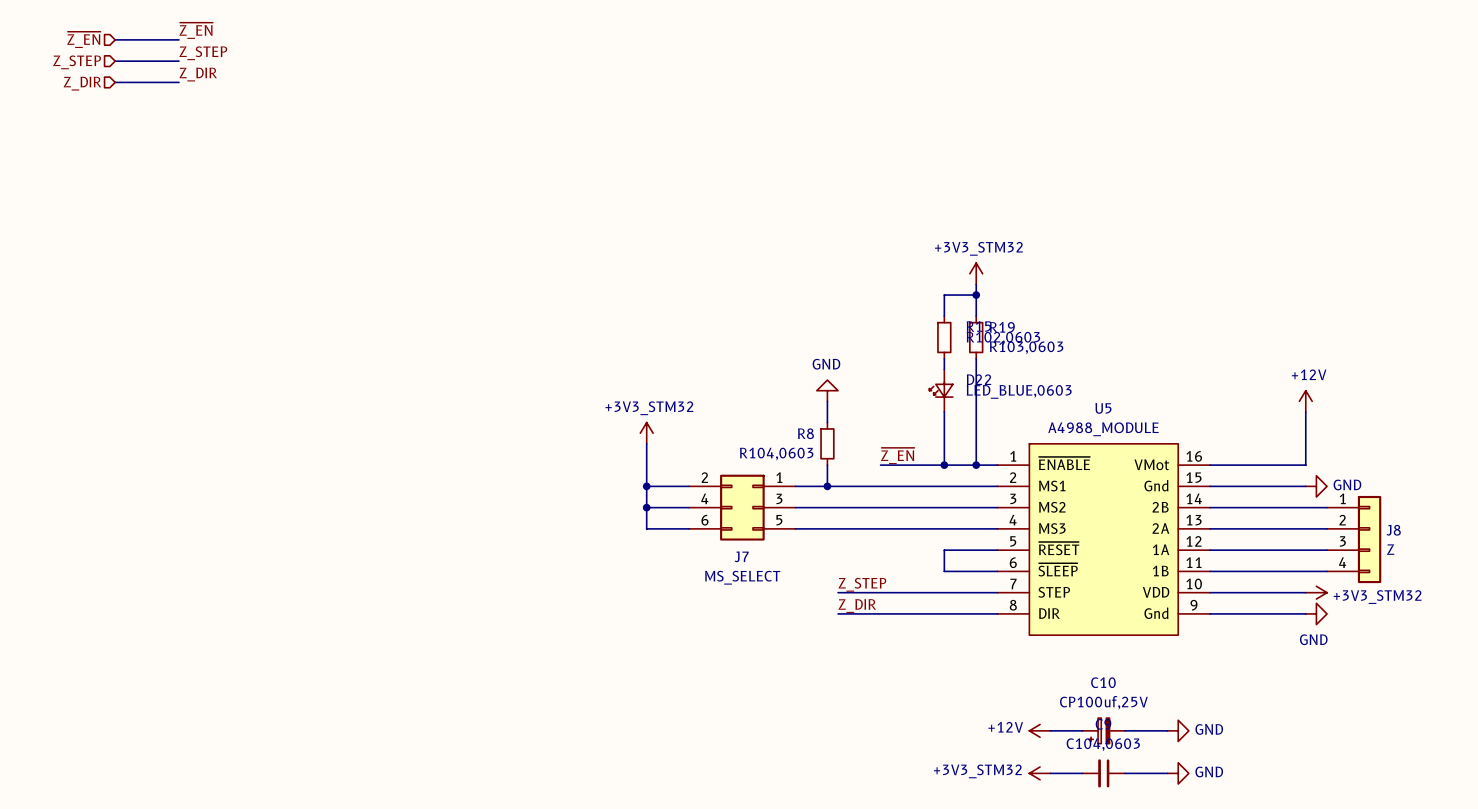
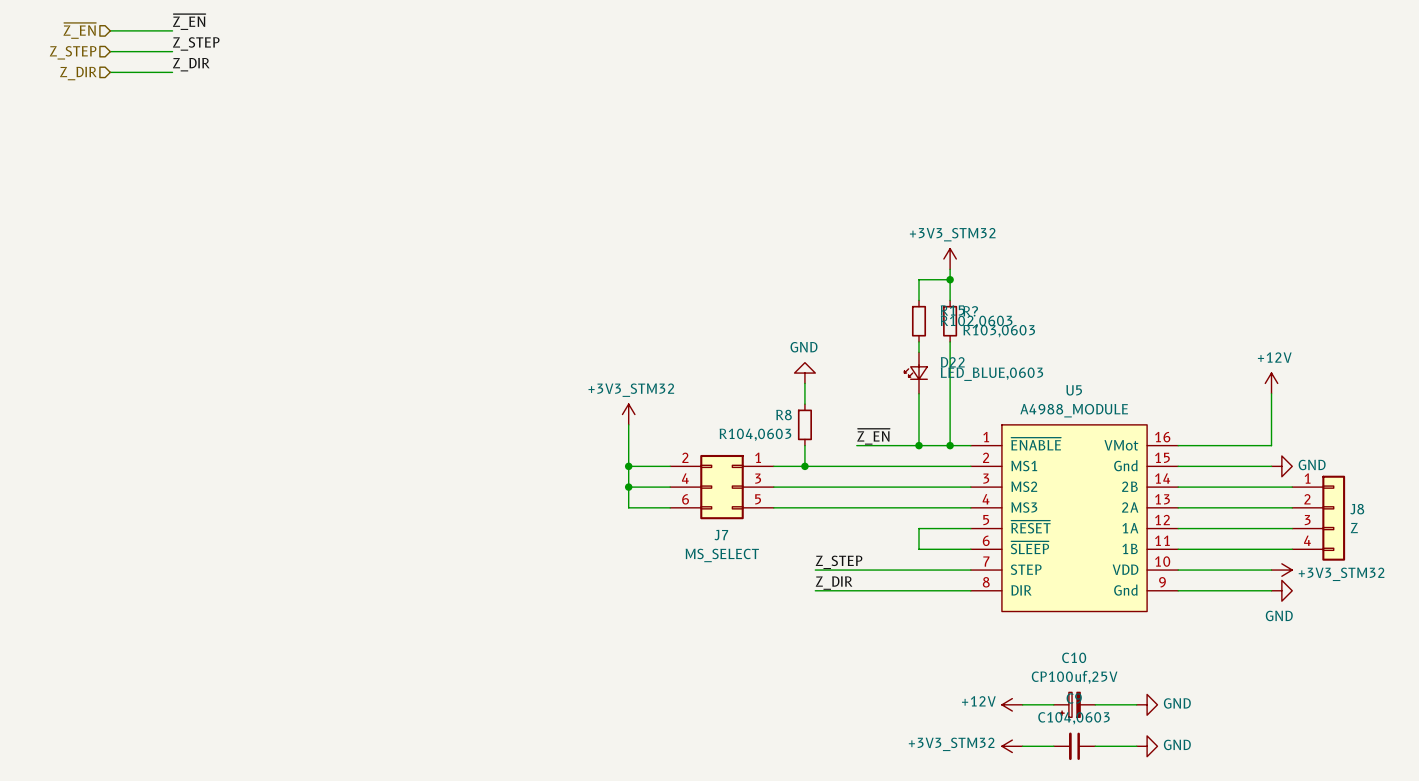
R19 name: R19 (1002, 327) -> R? (970, 311)

